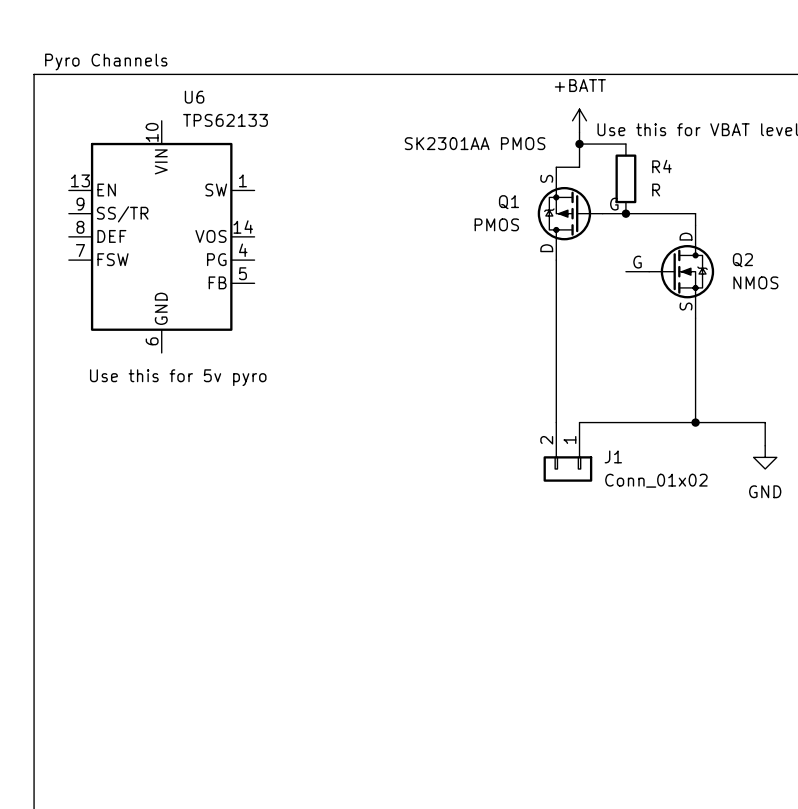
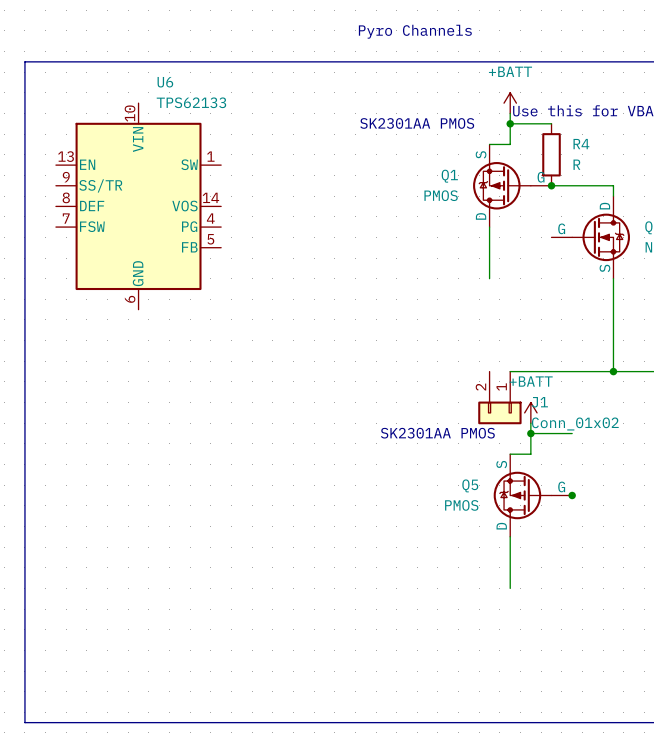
text: none -> Pyro Channels (415, 31)
text: Pyro Channels (106, 62) -> none
wire: (556, 318) (556, 422) -> none
text: Use this for 5v pyro (178, 377) -> none
power symbol: none -> +BATT (530, 412)
wire: none -> (530, 423) (530, 454) (510, 454)
text: none -> SK2301AA PMOS (437, 433)
wire: none -> (530, 433) (572, 433)
junction: none -> (530, 433)
Q5: none -> PMOS (532, 495)
junction: none -> (572, 495)
wire: none -> (510, 536) (510, 588)

